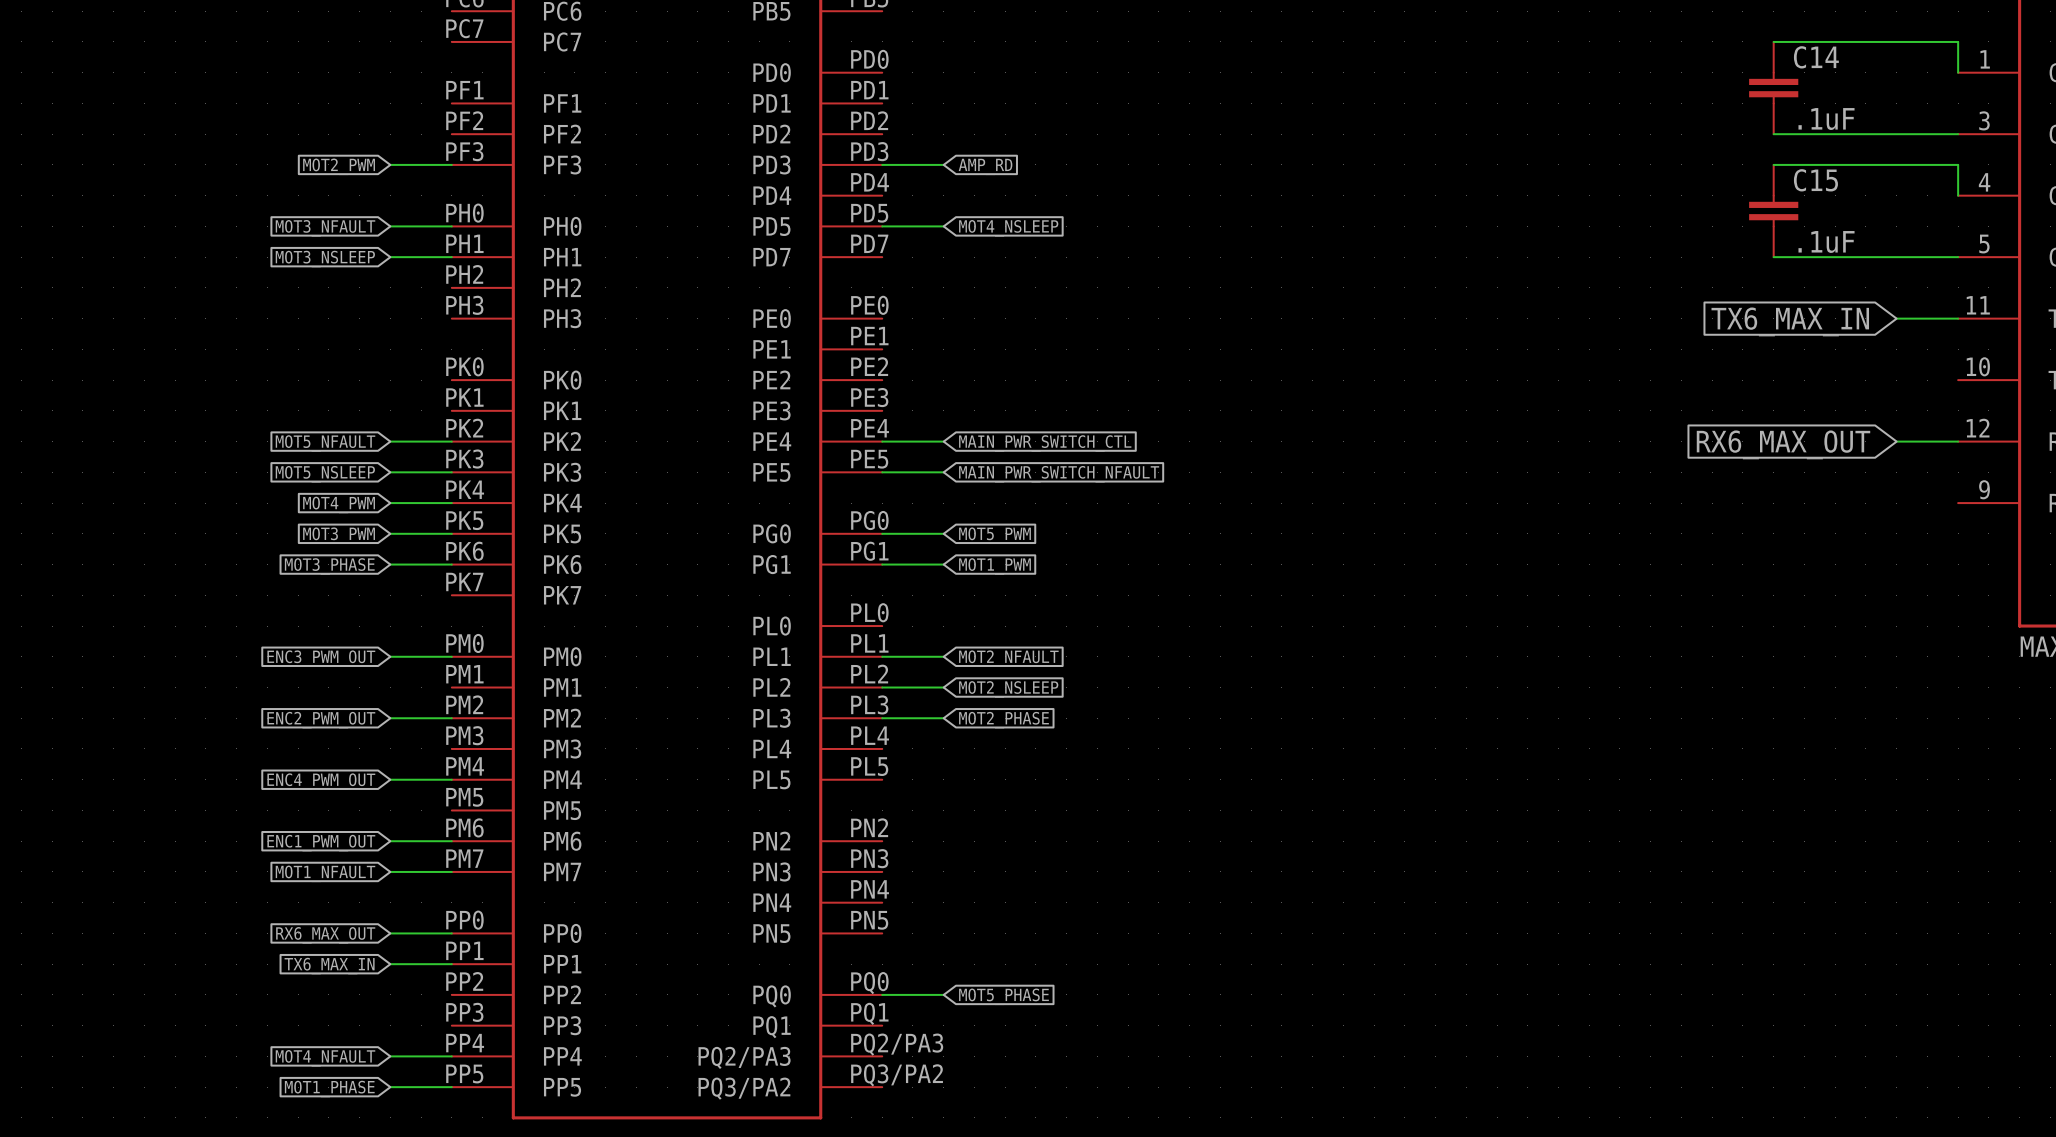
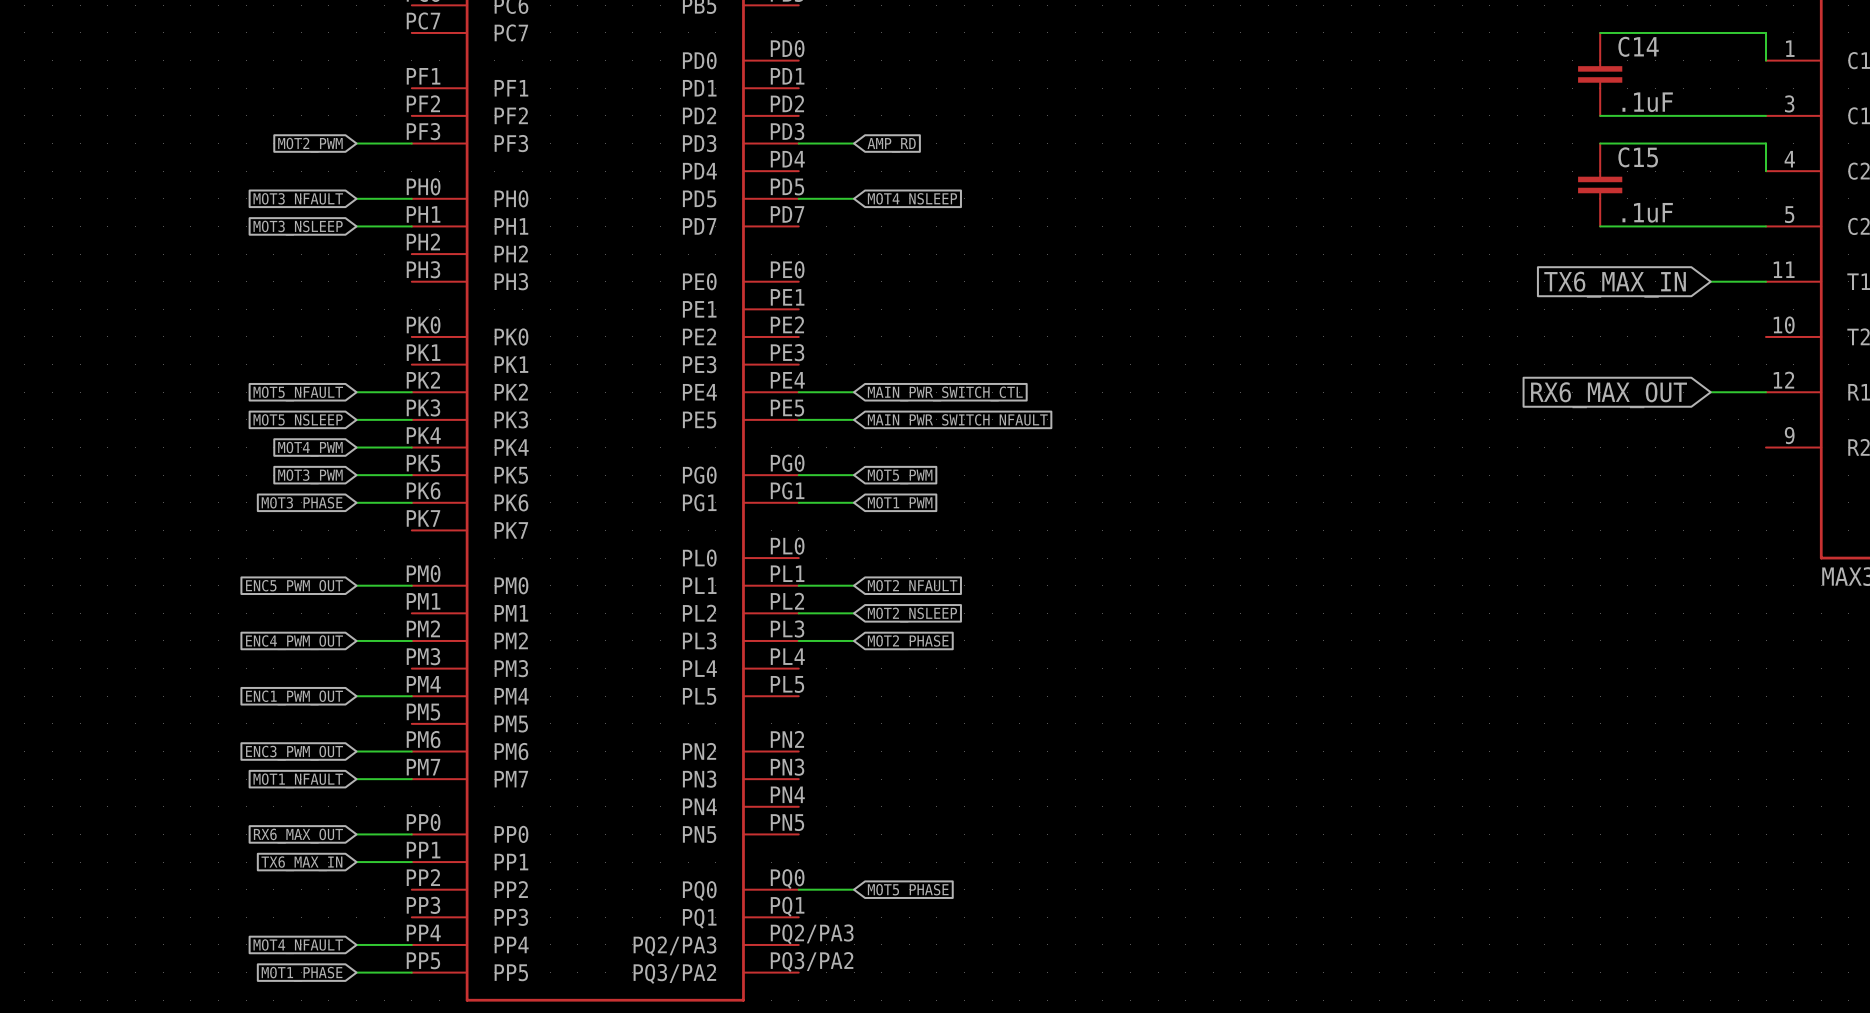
global label: ENC3_PWM_OUT (321, 658) -> ENC5_PWM_OUT (294, 587)
global label: ENC2_PWM_OUT (321, 720) -> ENC4_PWM_OUT (294, 642)
global label: ENC4_PWM_OUT (321, 781) -> ENC1_PWM_OUT (294, 697)
global label: ENC1_PWM_OUT (321, 843) -> ENC3_PWM_OUT (294, 753)

